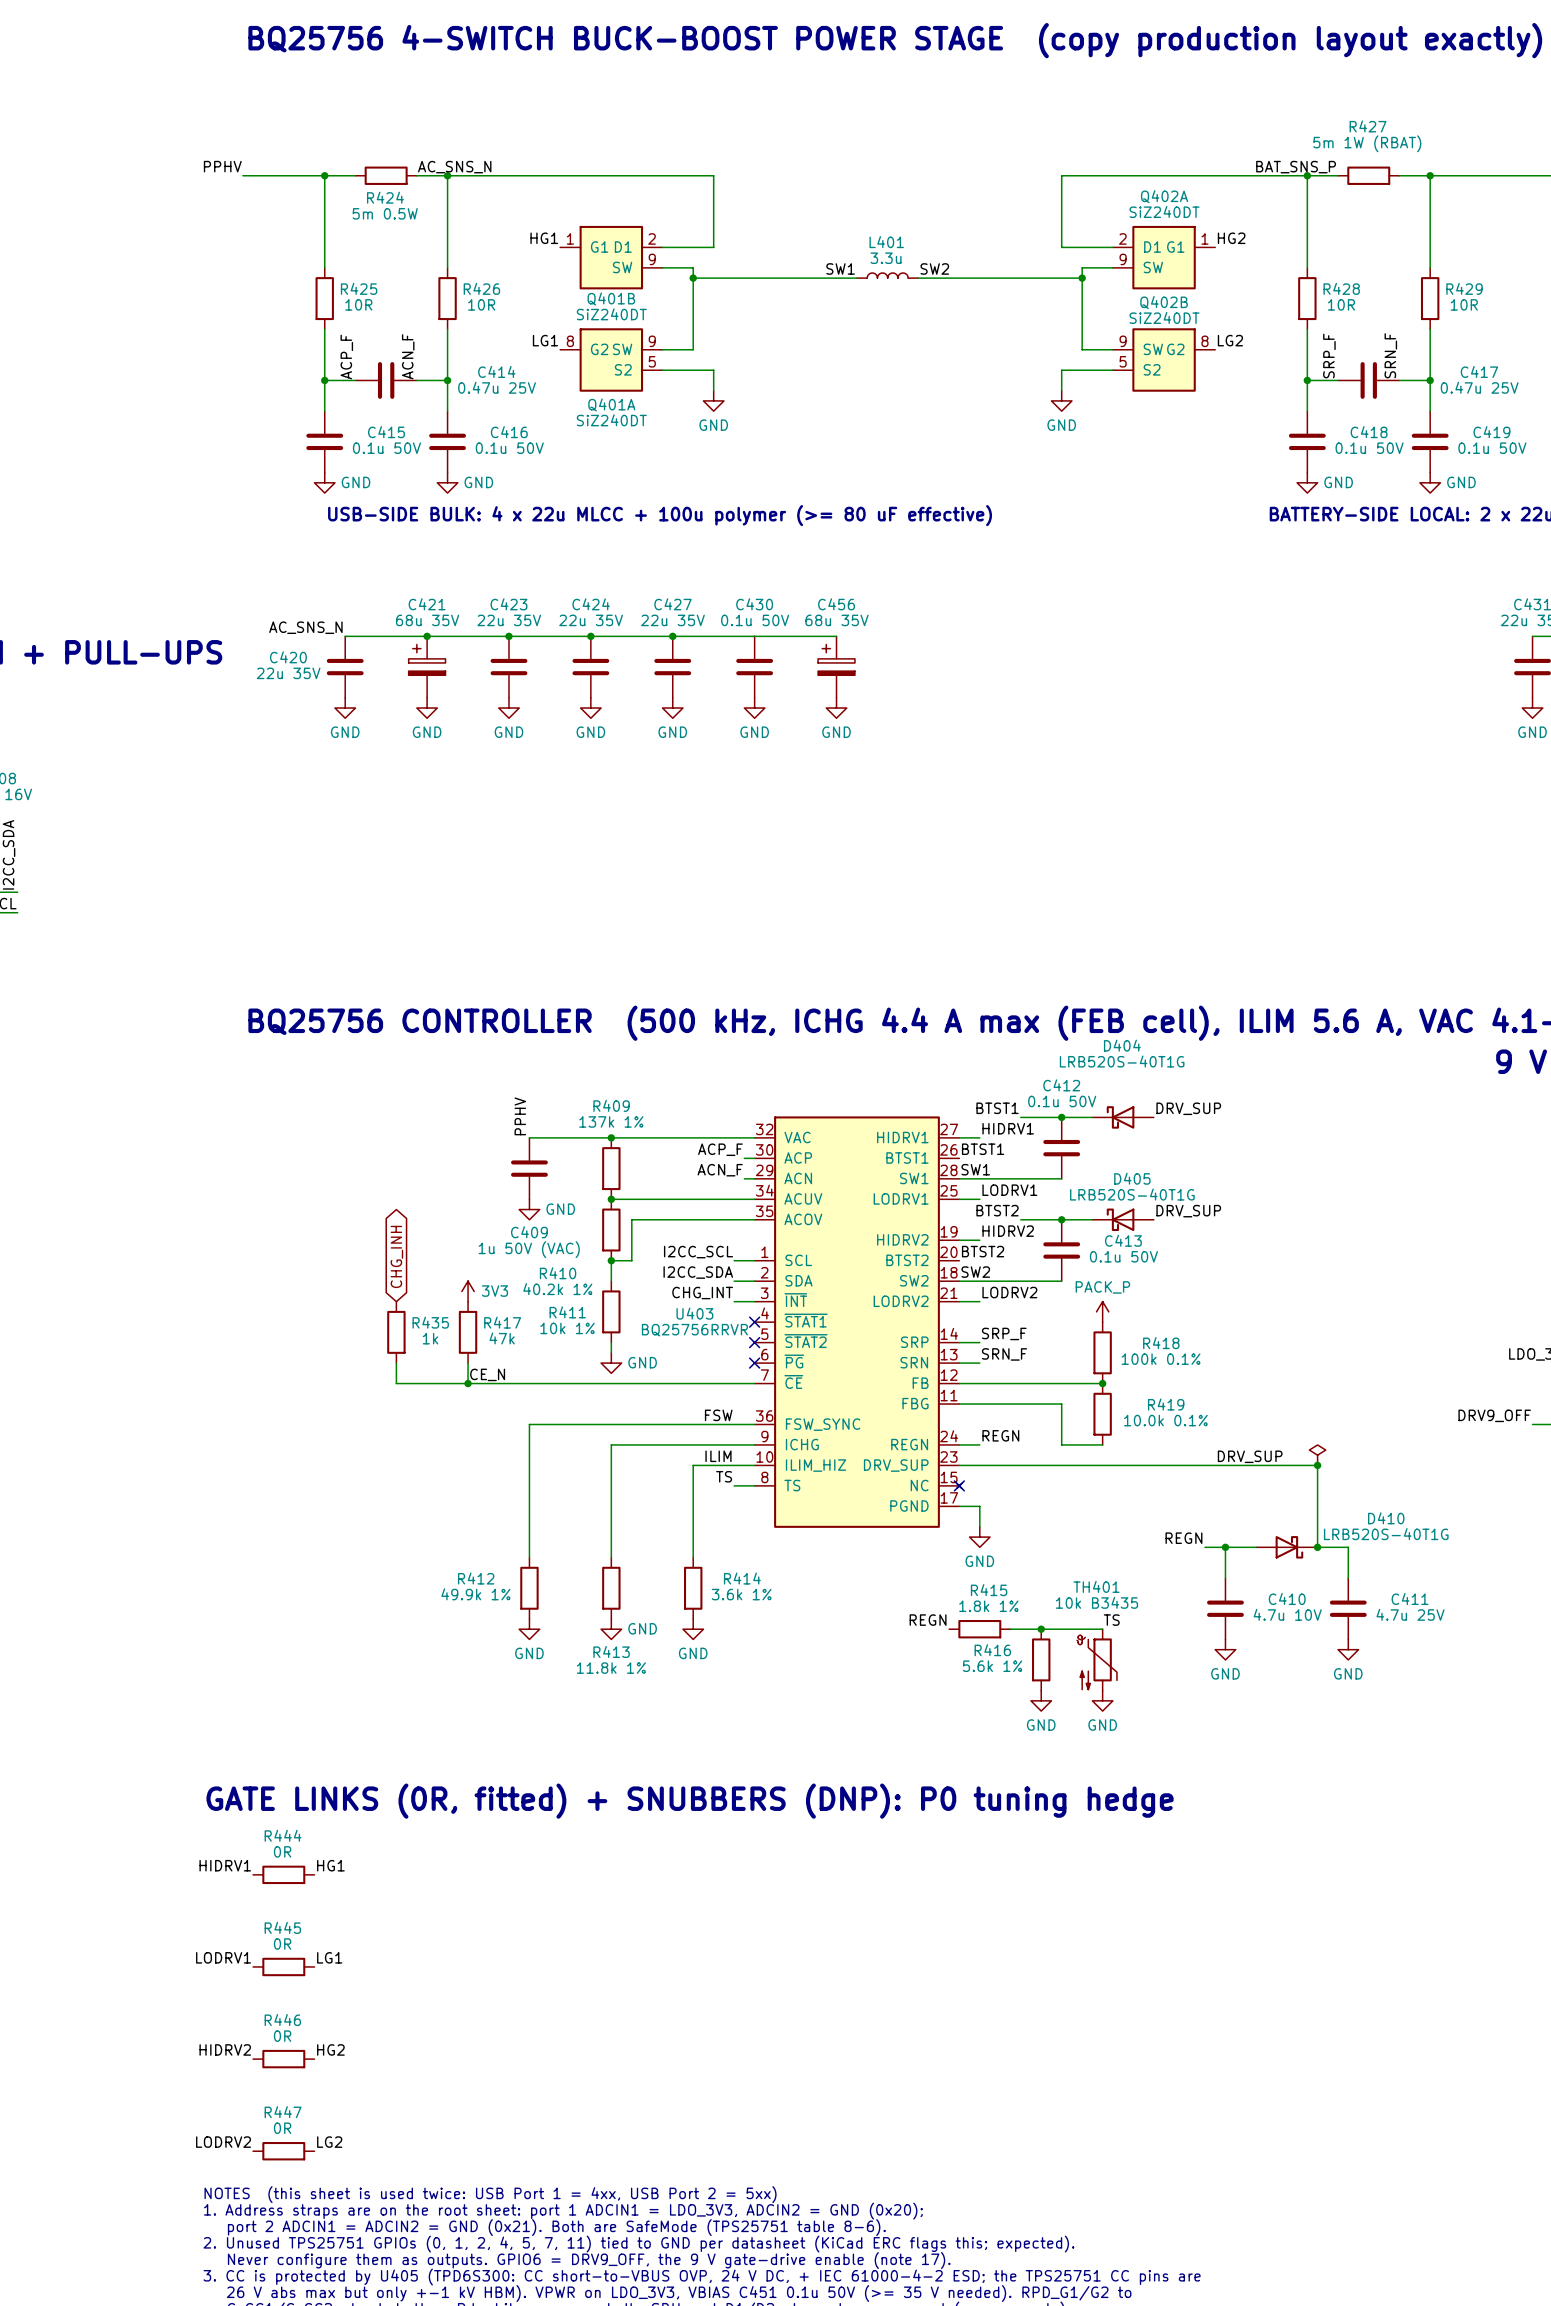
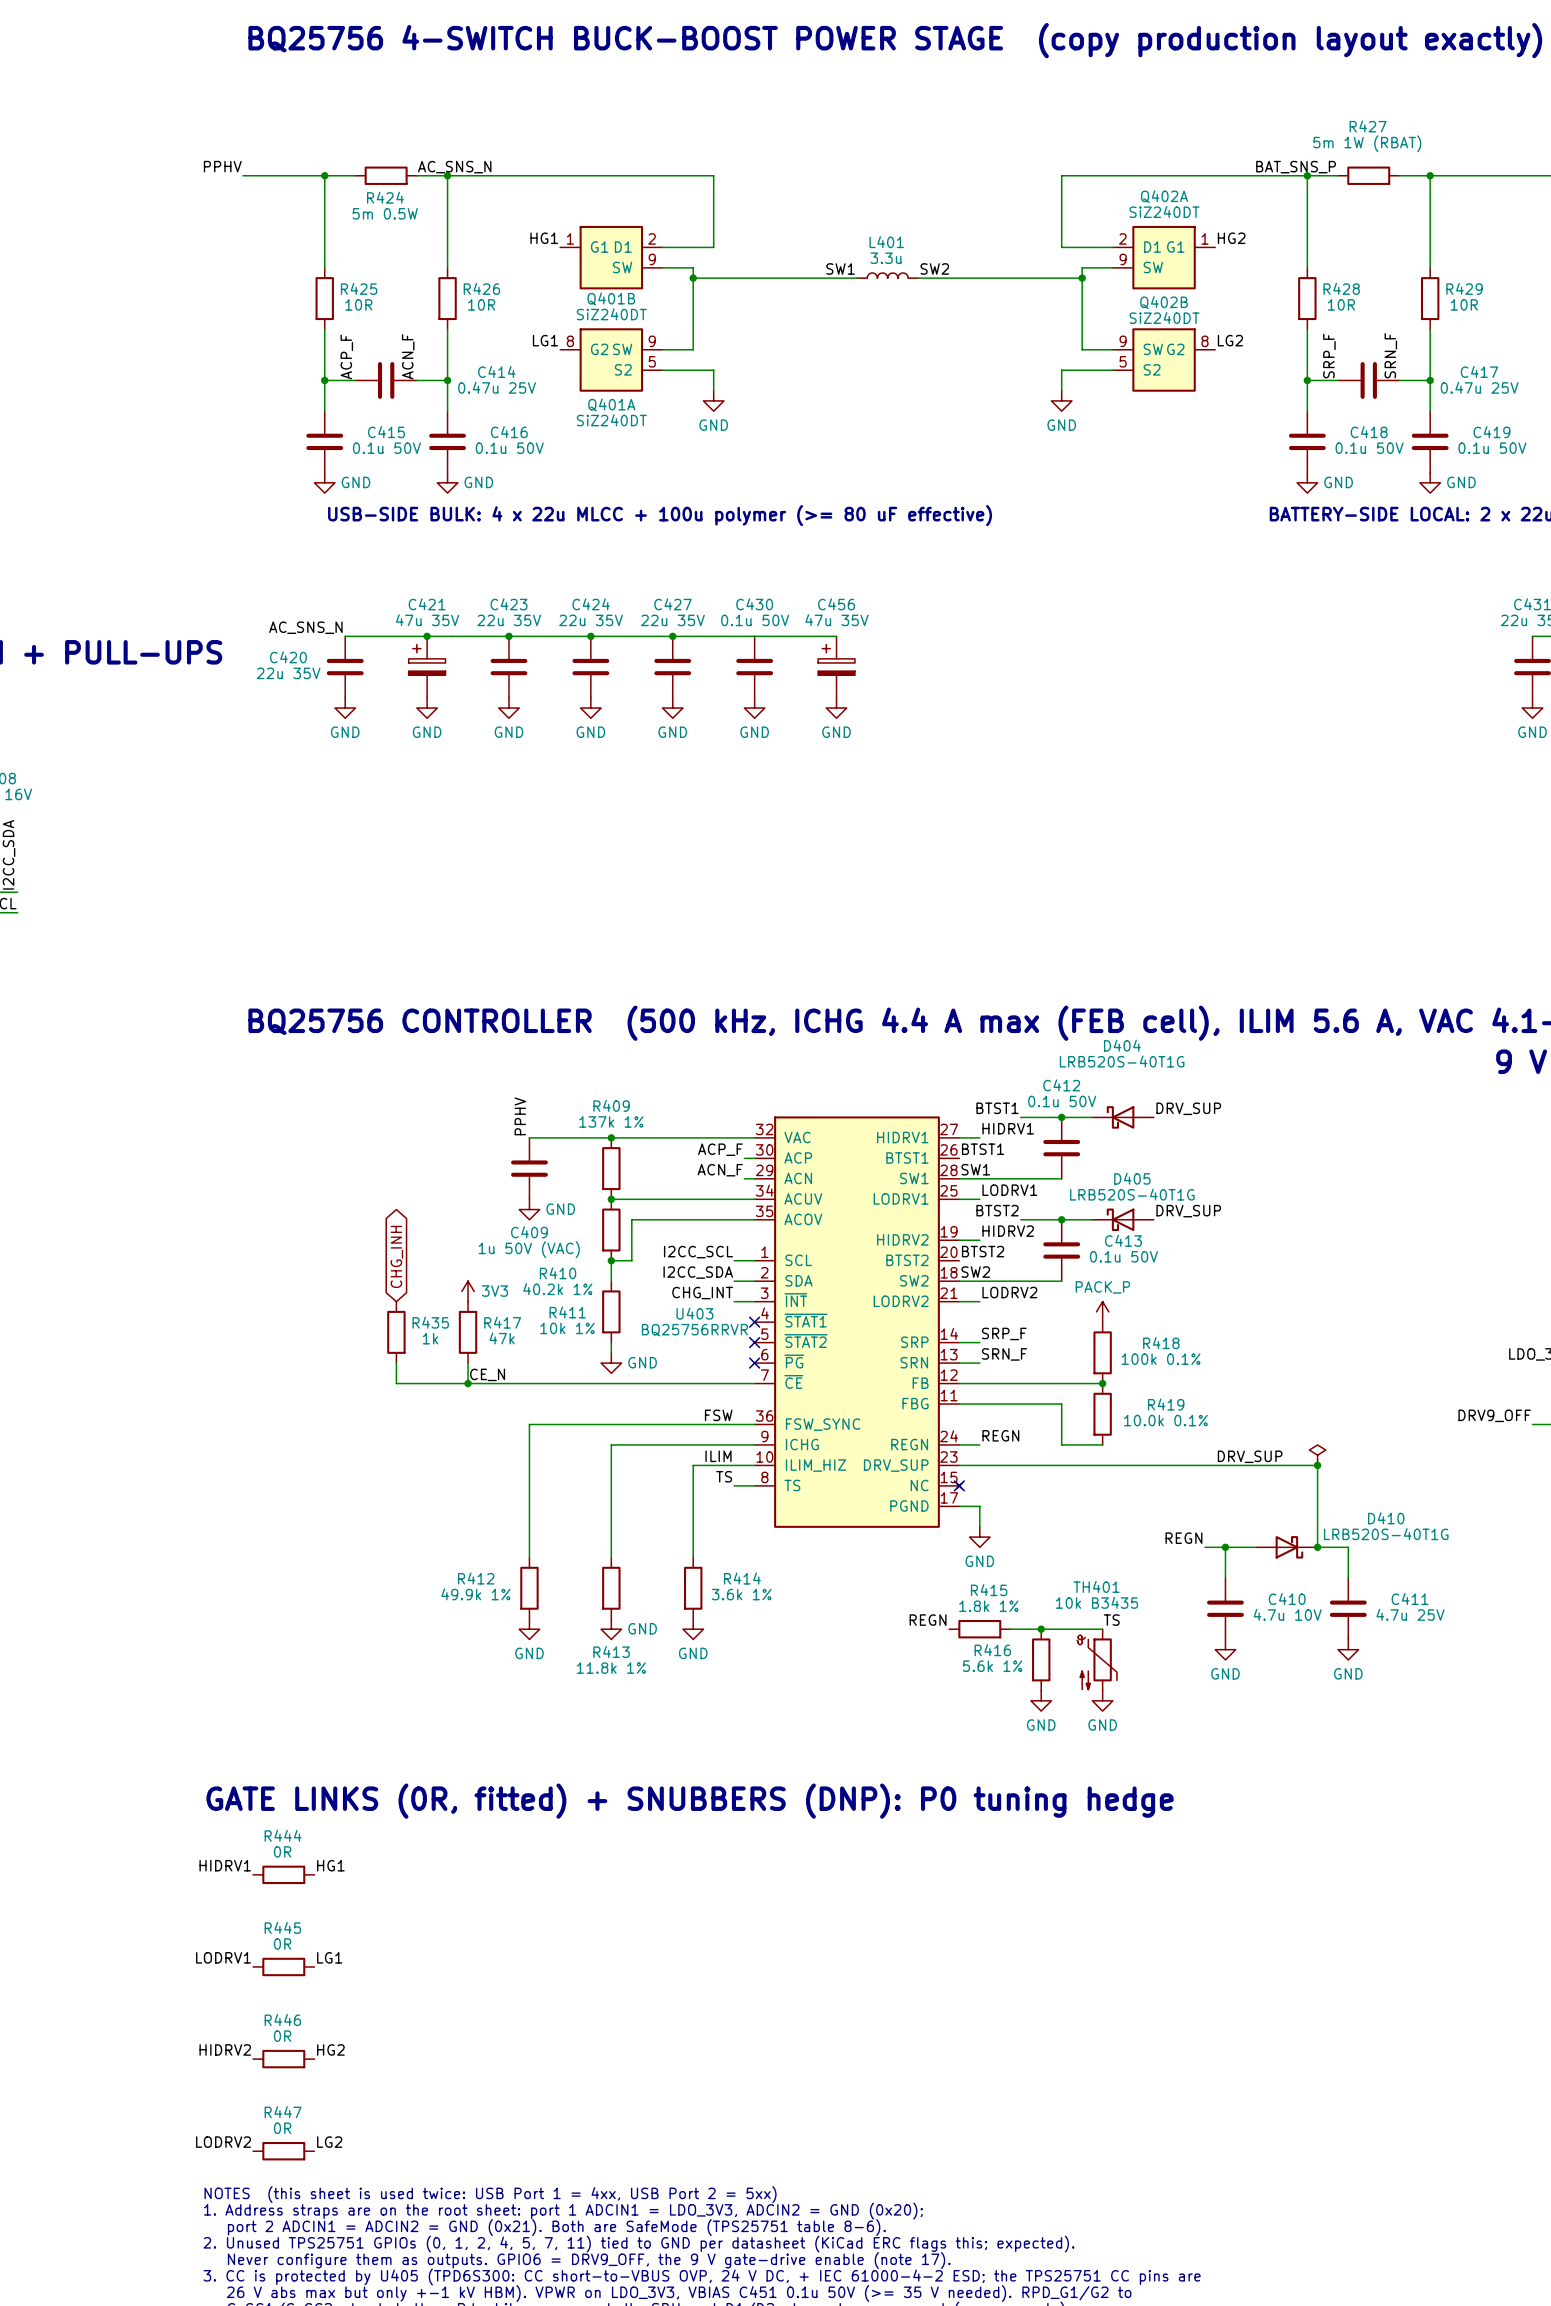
C421 value: 68u 35V (427, 620) -> 47u 35V (427, 620)
C456 value: 68u 35V (837, 620) -> 47u 35V (837, 620)

